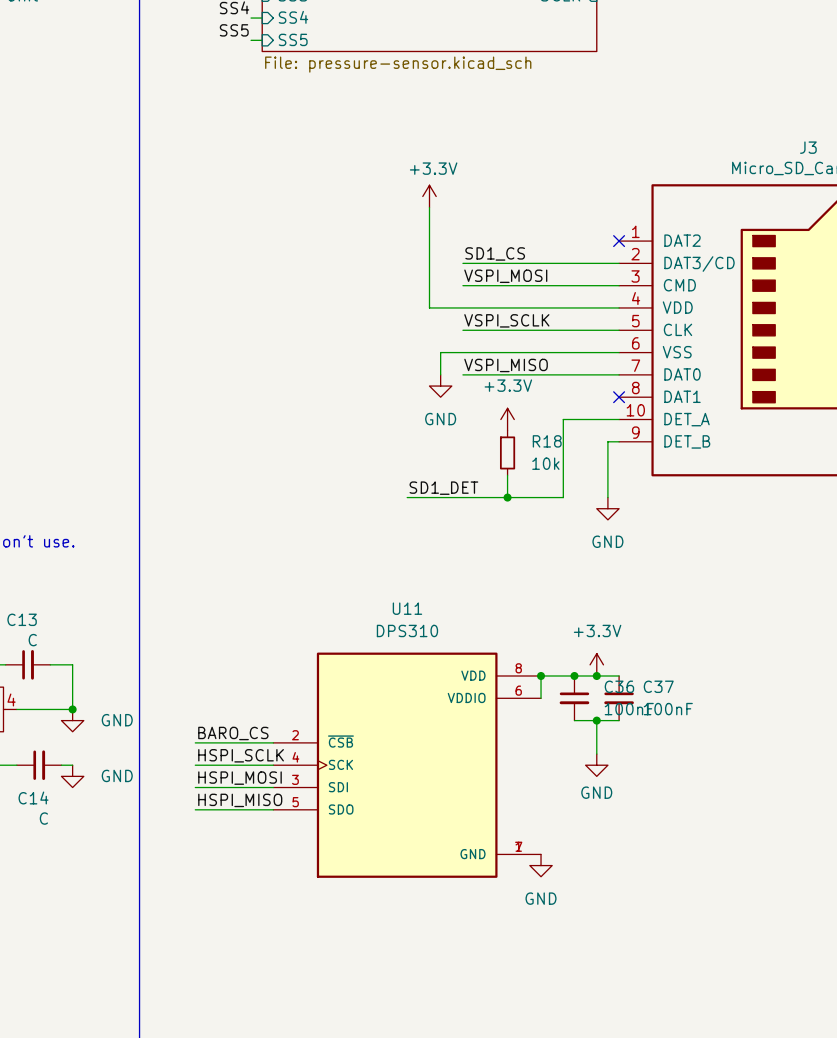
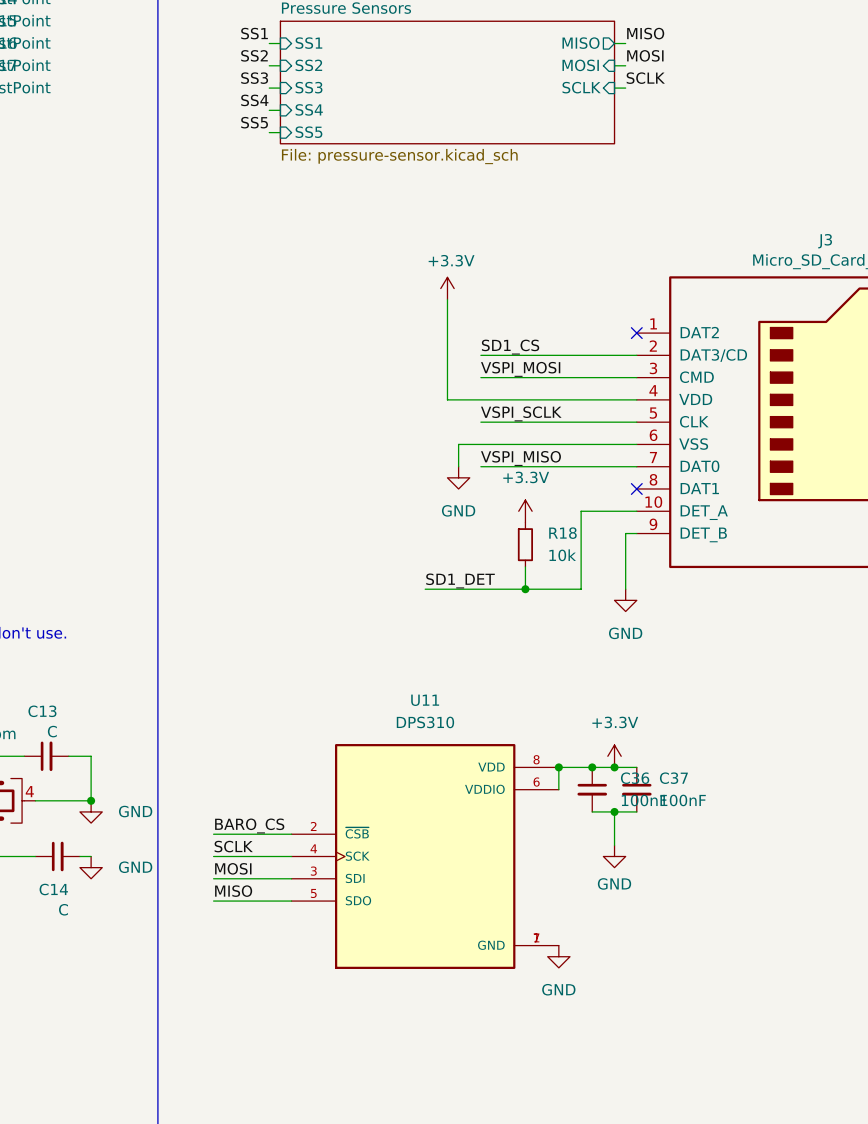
label: HSPI_SCLK (241, 755) -> SCLK (233, 846)
label: HSPI_MOSI (239, 778) -> MOSI (233, 868)
label: HSPI_MISO (240, 800) -> MISO (233, 891)

